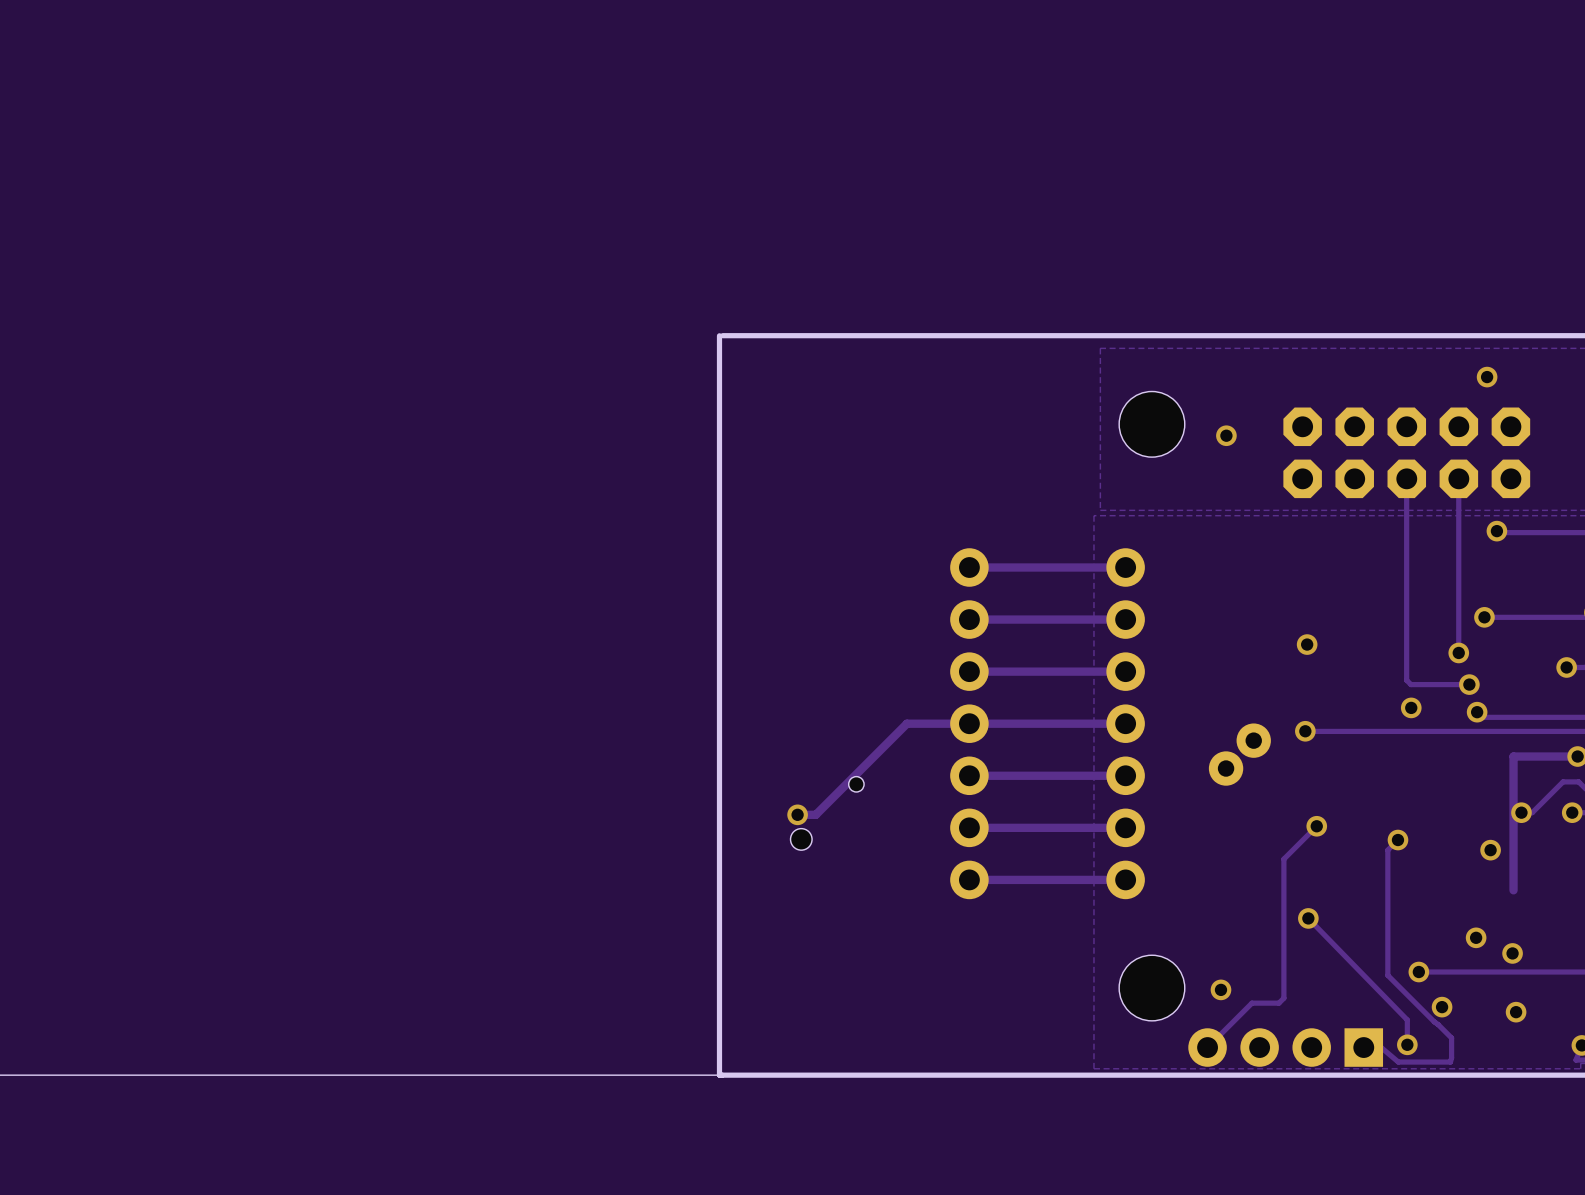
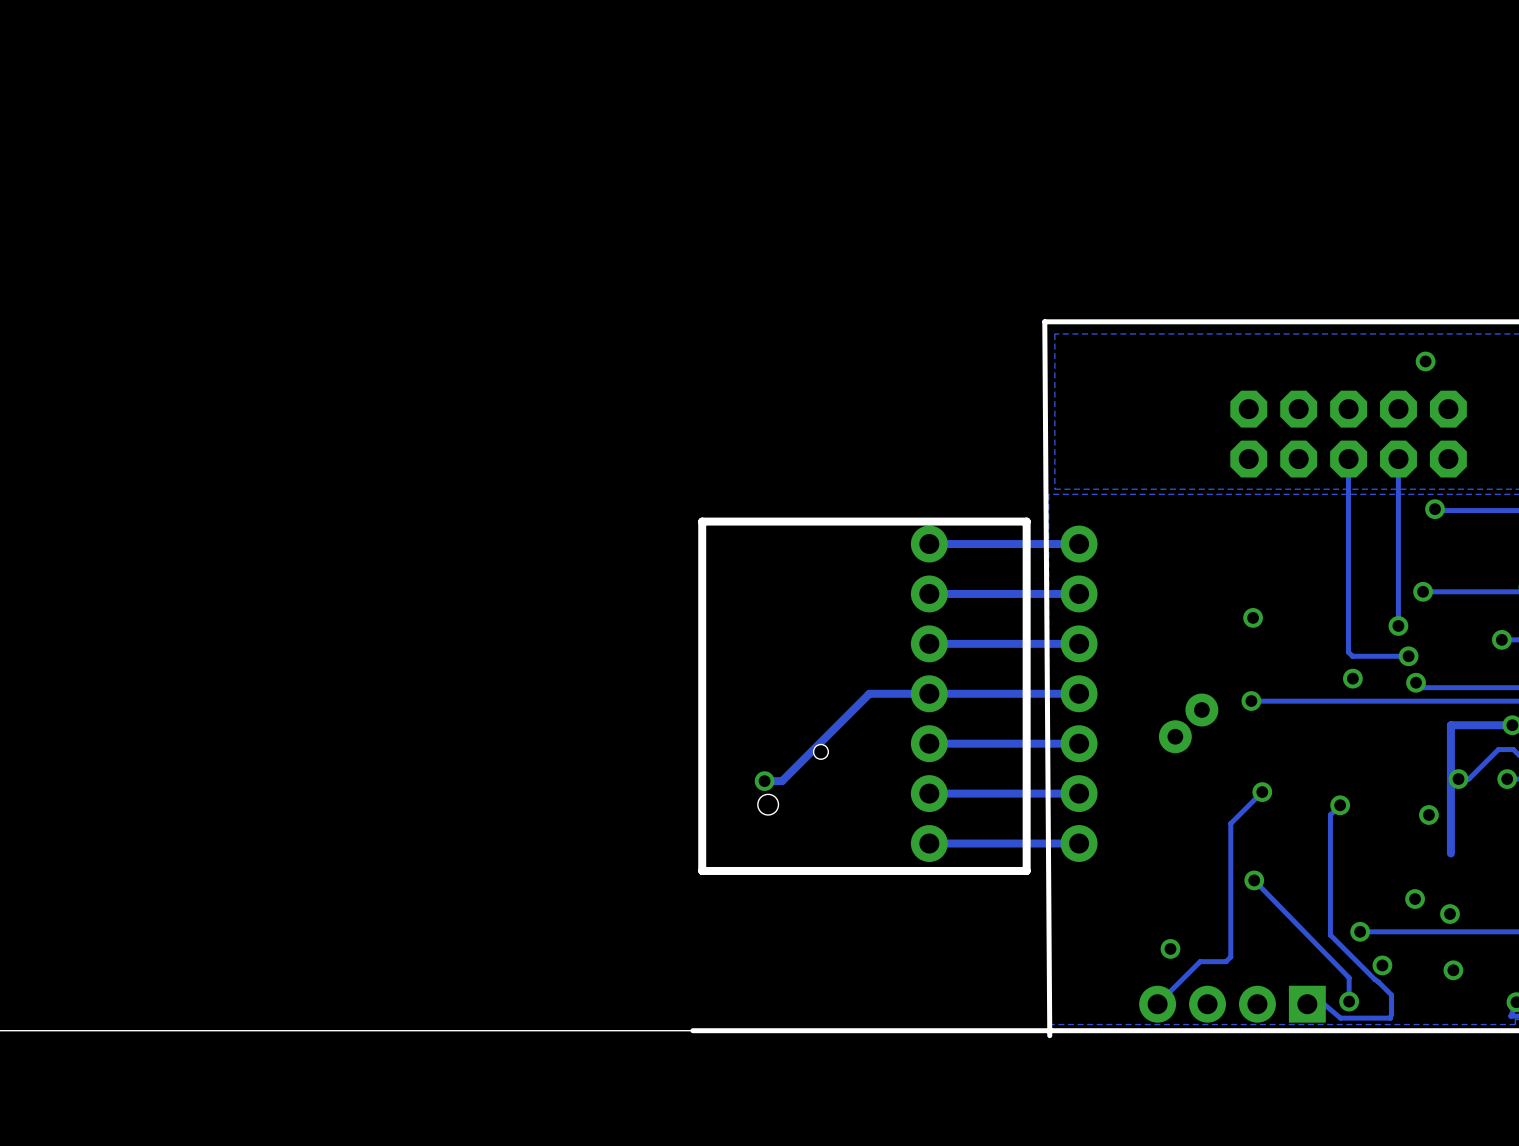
board edge: (719, 335) (719, 1075) (722, 1075) -> none
board edge: (1089, 335) (722, 335) -> (1044, 321) (1049, 1035)
hole: (1151, 424) -> none
via: (1226, 435) -> none
board edge: none -> (1026, 521) (1026, 870) (702, 870) (702, 521) (1026, 521)
hole: (1151, 988) -> none

